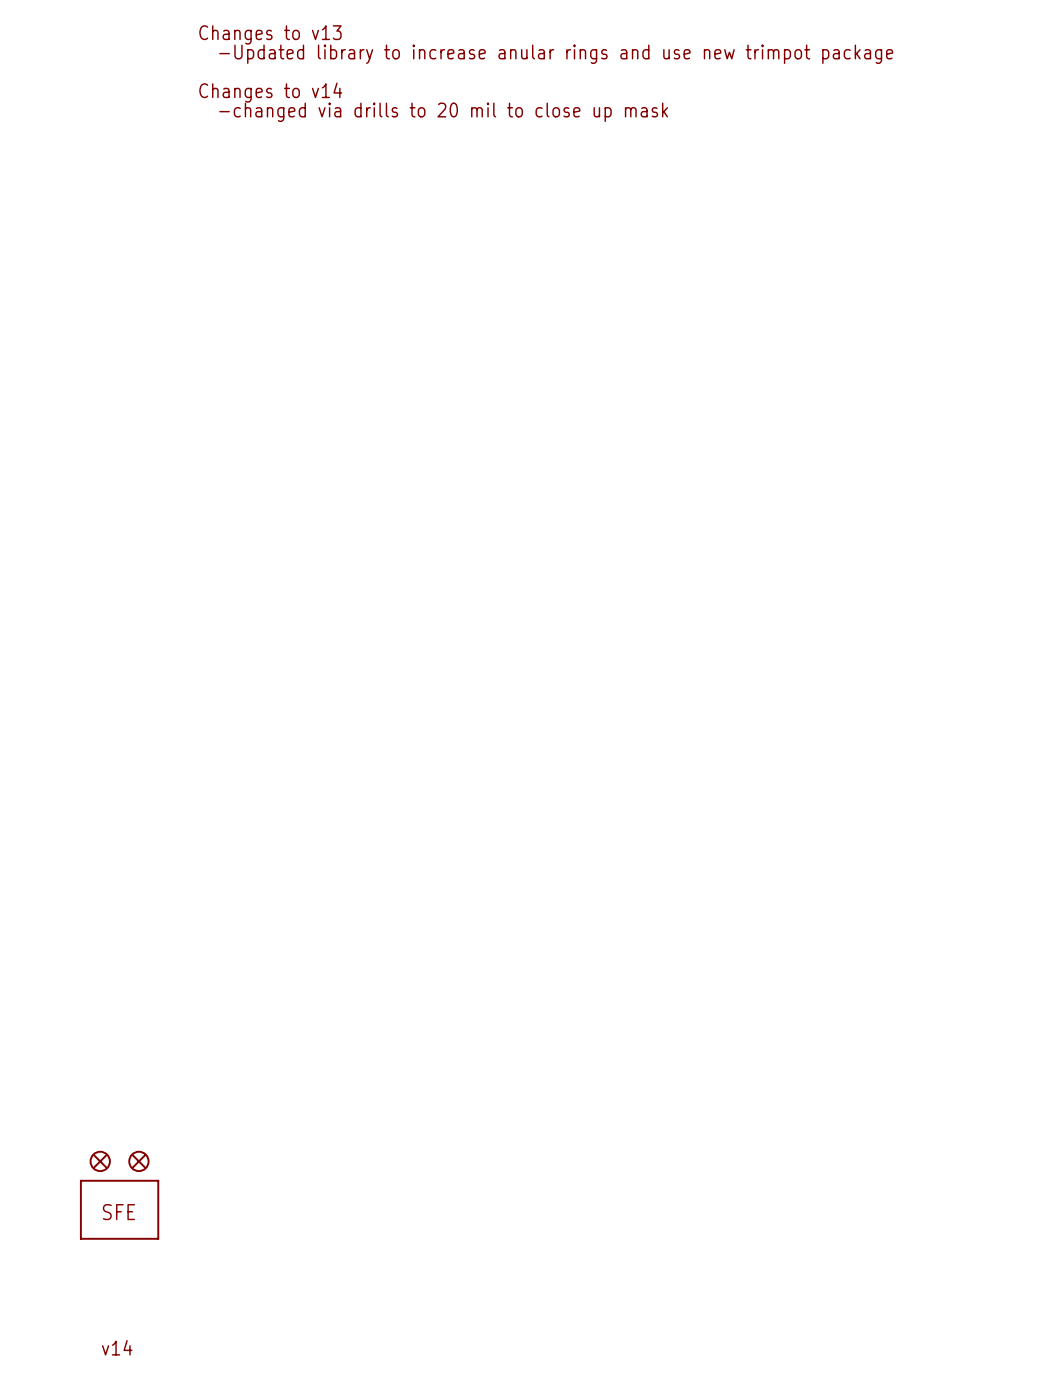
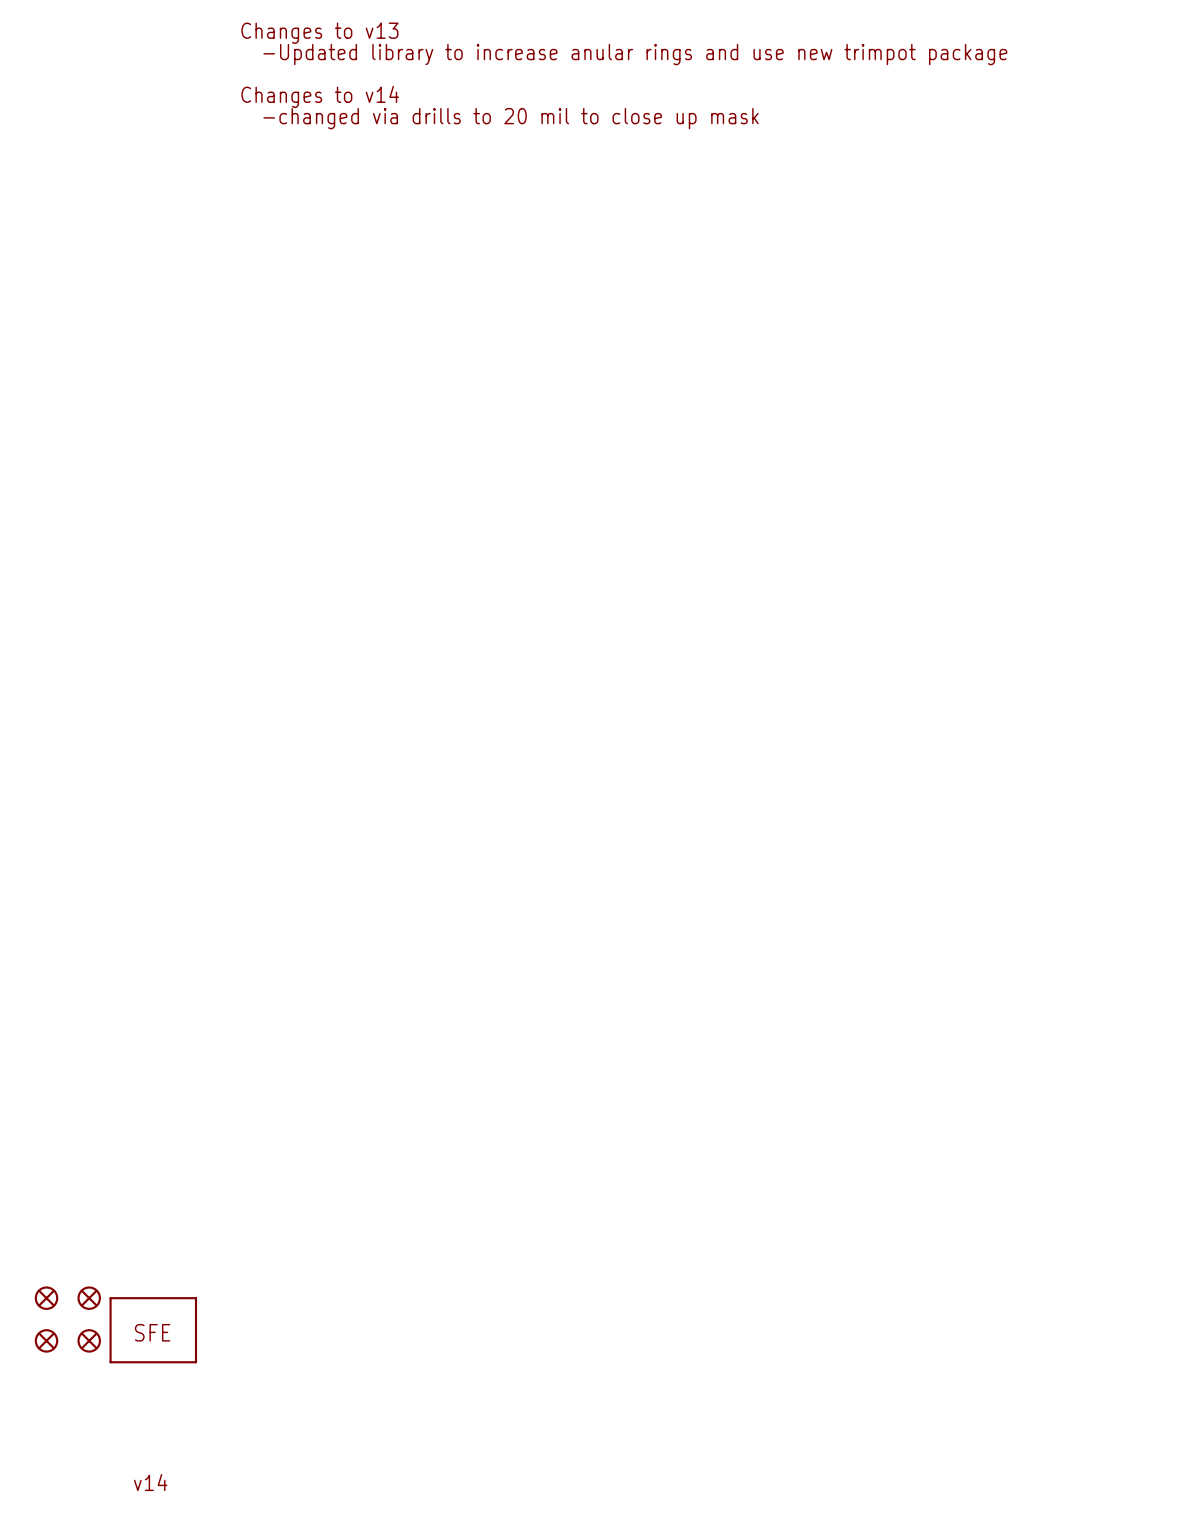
part: (100, 1161) -> none
part: (138, 1161) -> none
part: none -> (46, 1298)
part: none -> (89, 1298)
part: none -> (46, 1340)
part: none -> (89, 1340)

